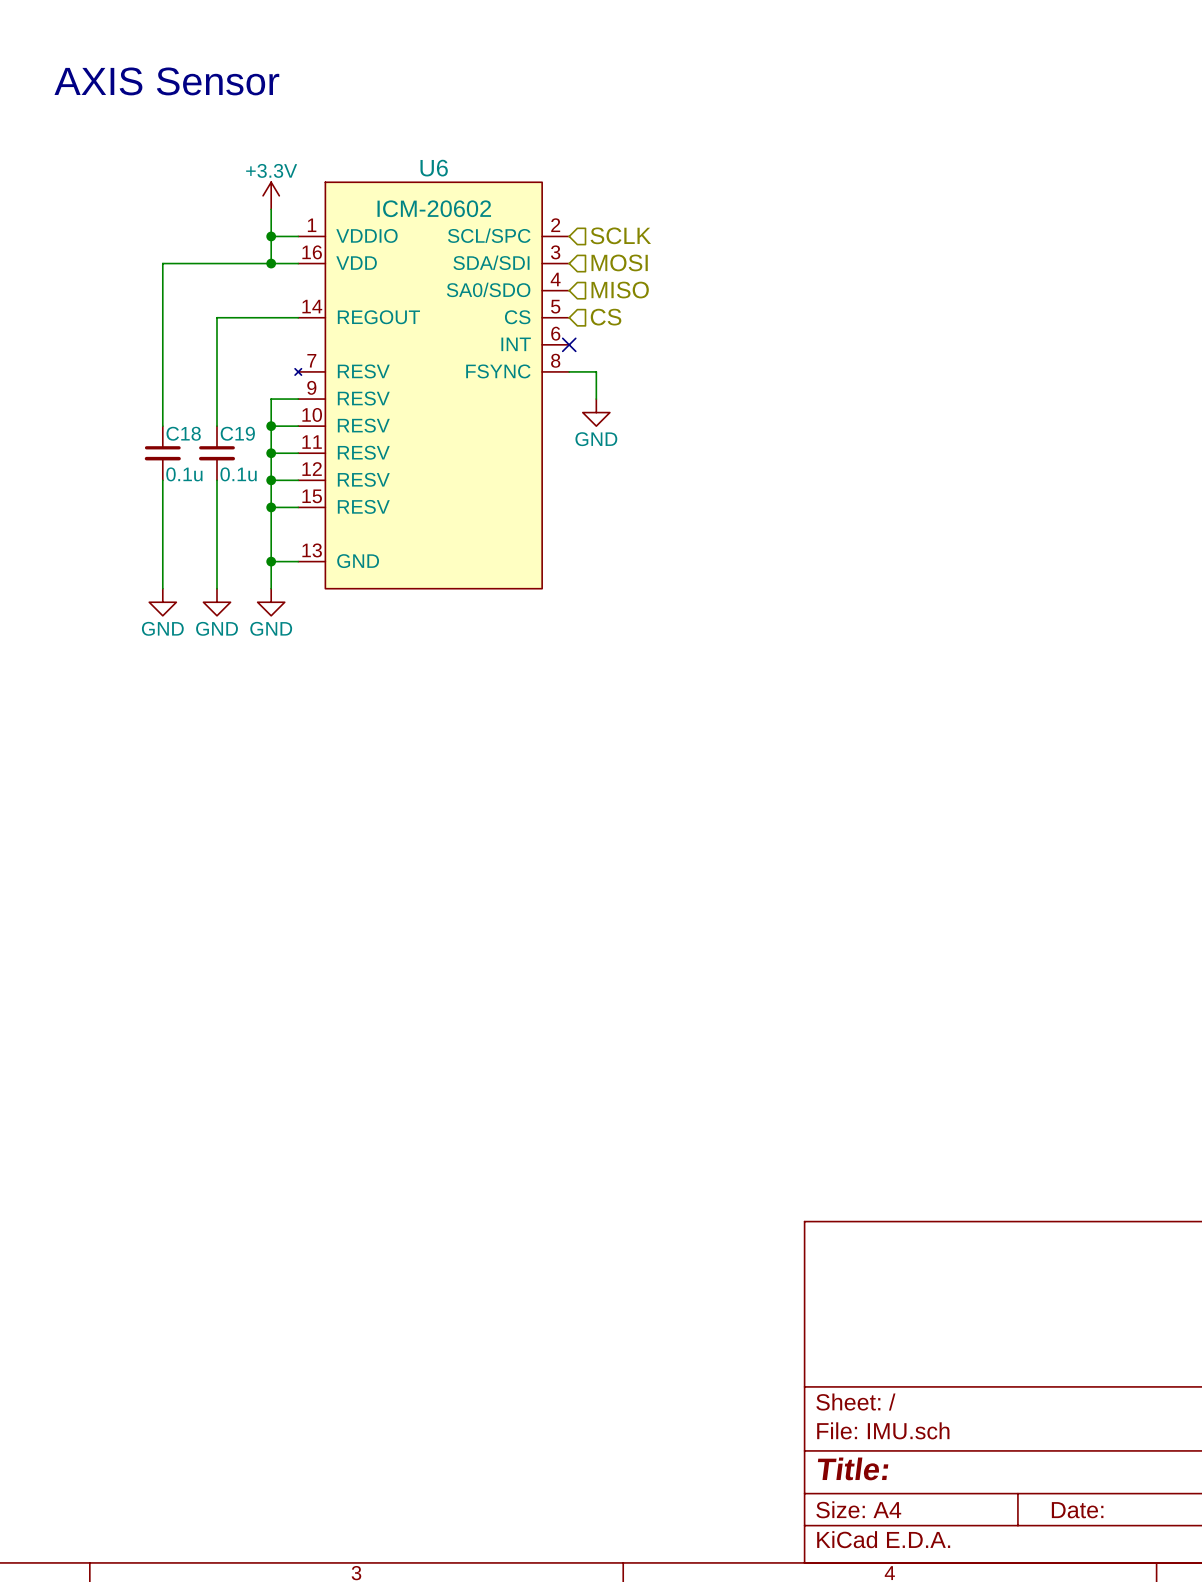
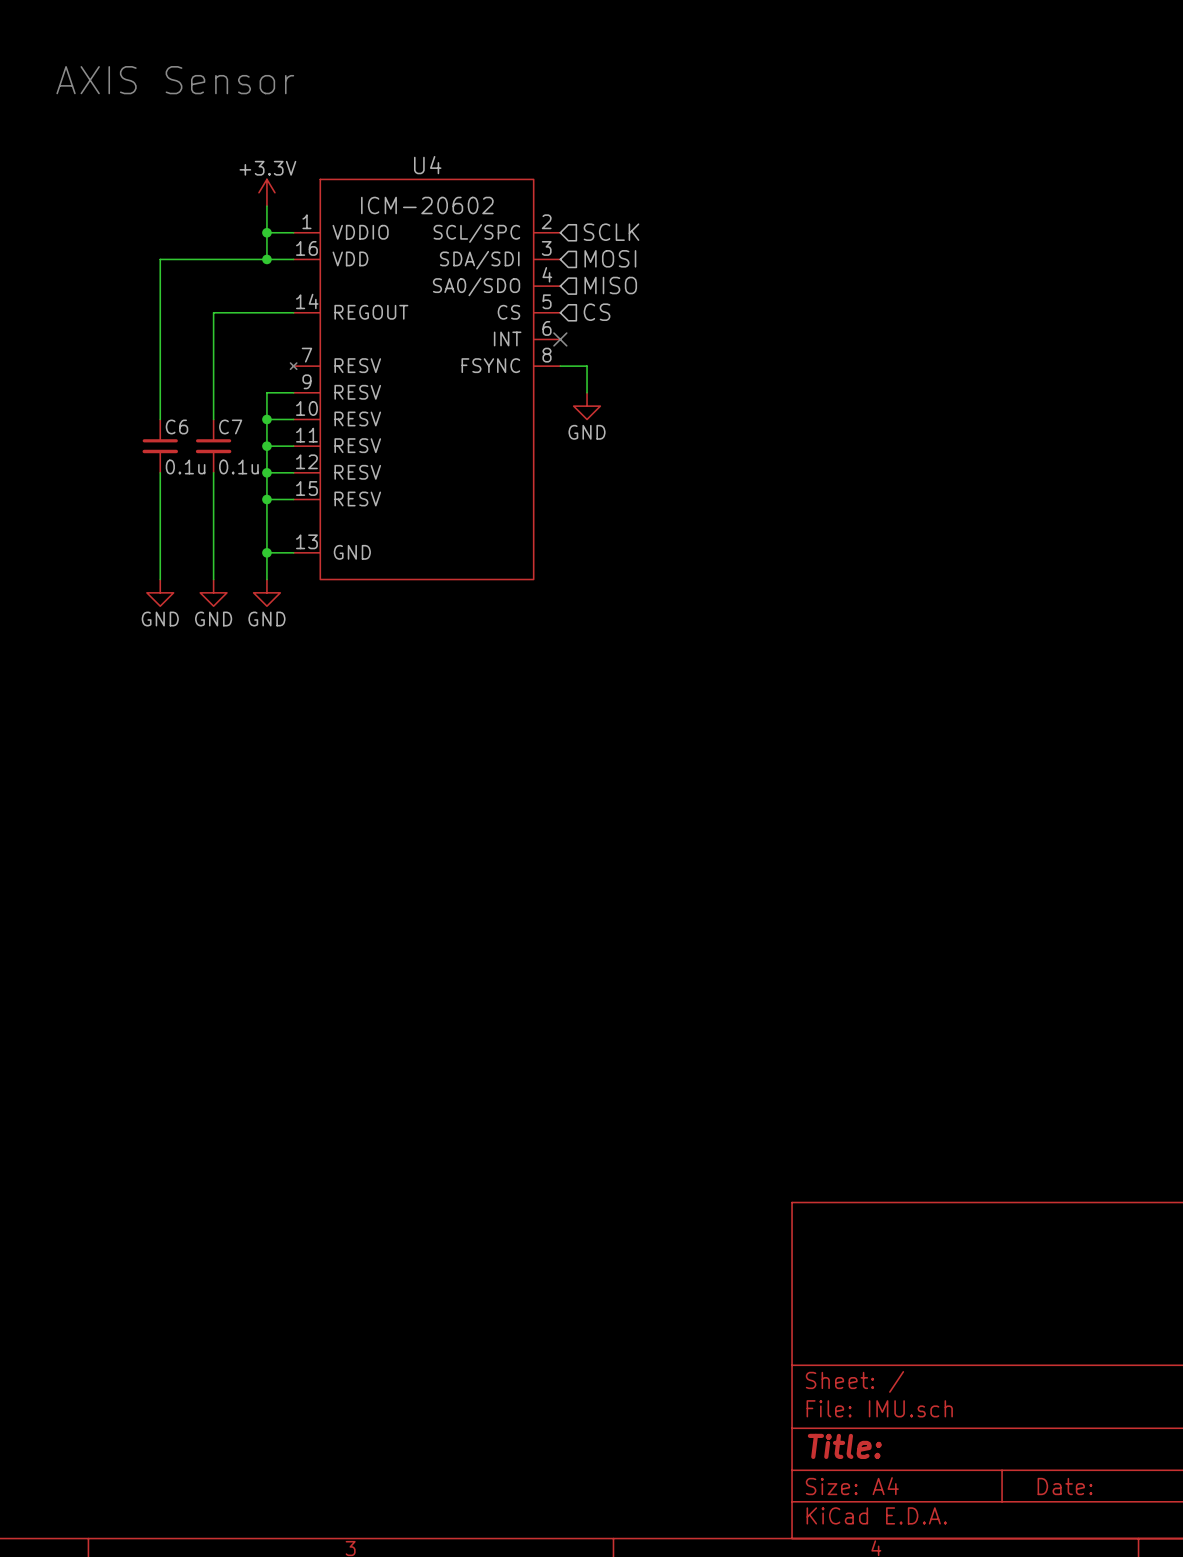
U6 name: U6 (434, 168) -> U4 (427, 165)
C18 name: C18 (183, 433) -> C6 (177, 426)
C19 name: C19 (237, 433) -> C7 (230, 426)

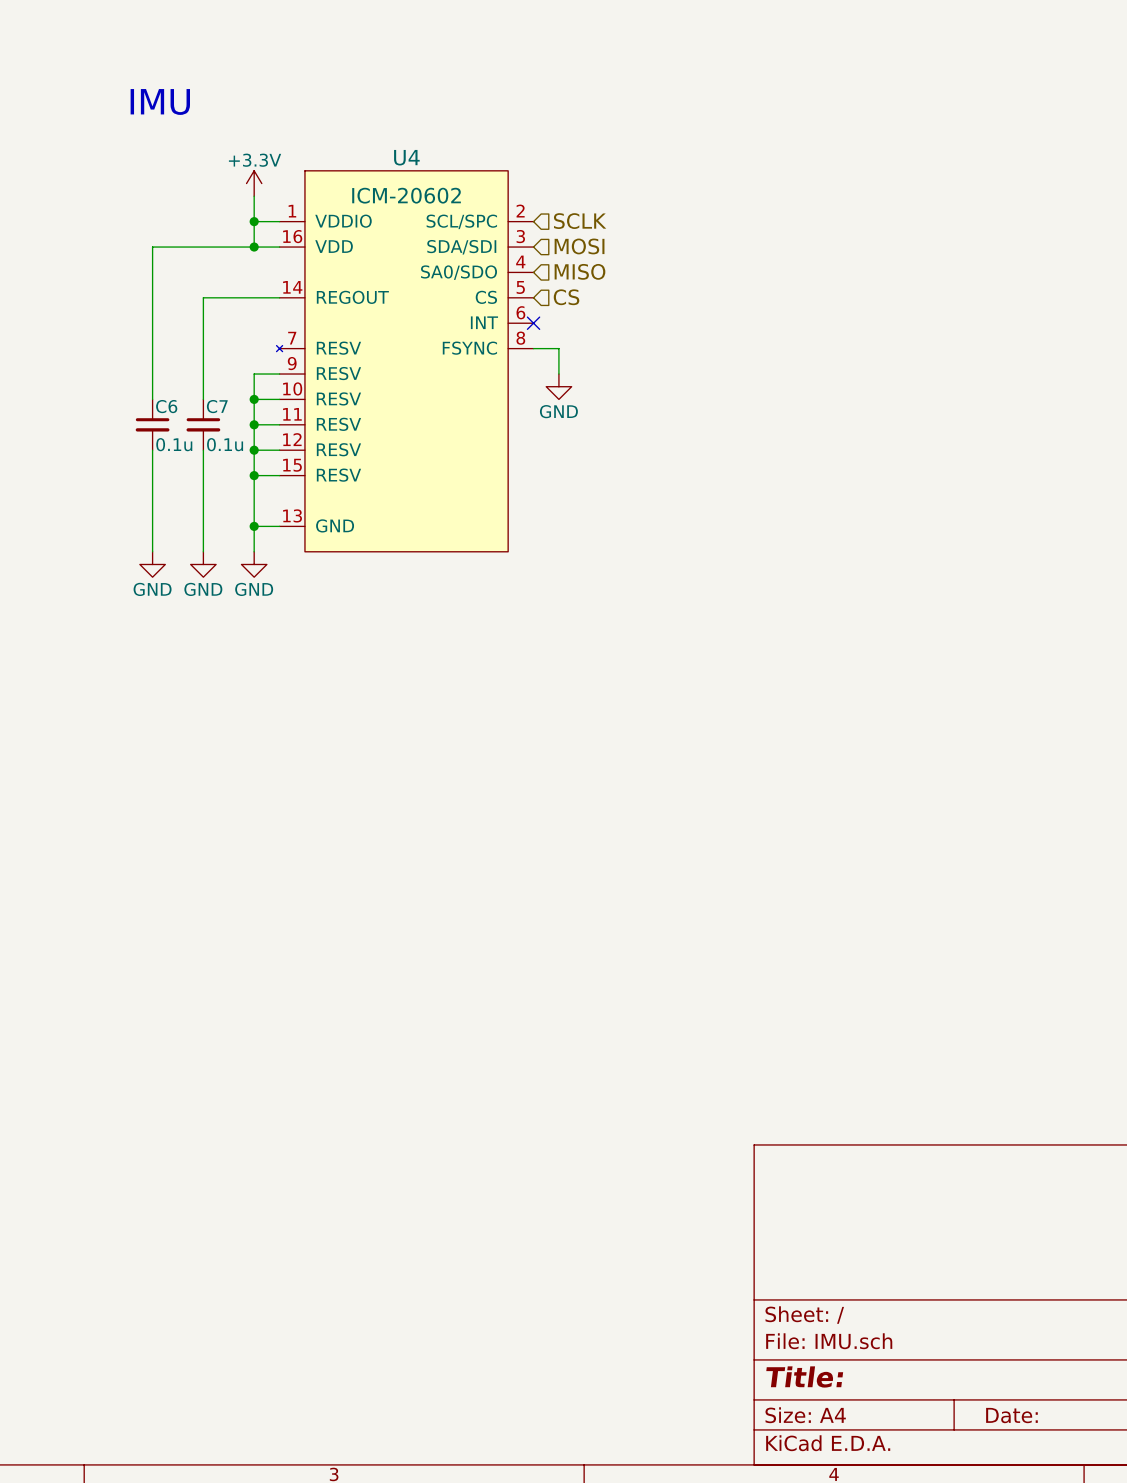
text: AXIS Sensor (175, 80) -> none
text: none -> IMU (160, 101)

